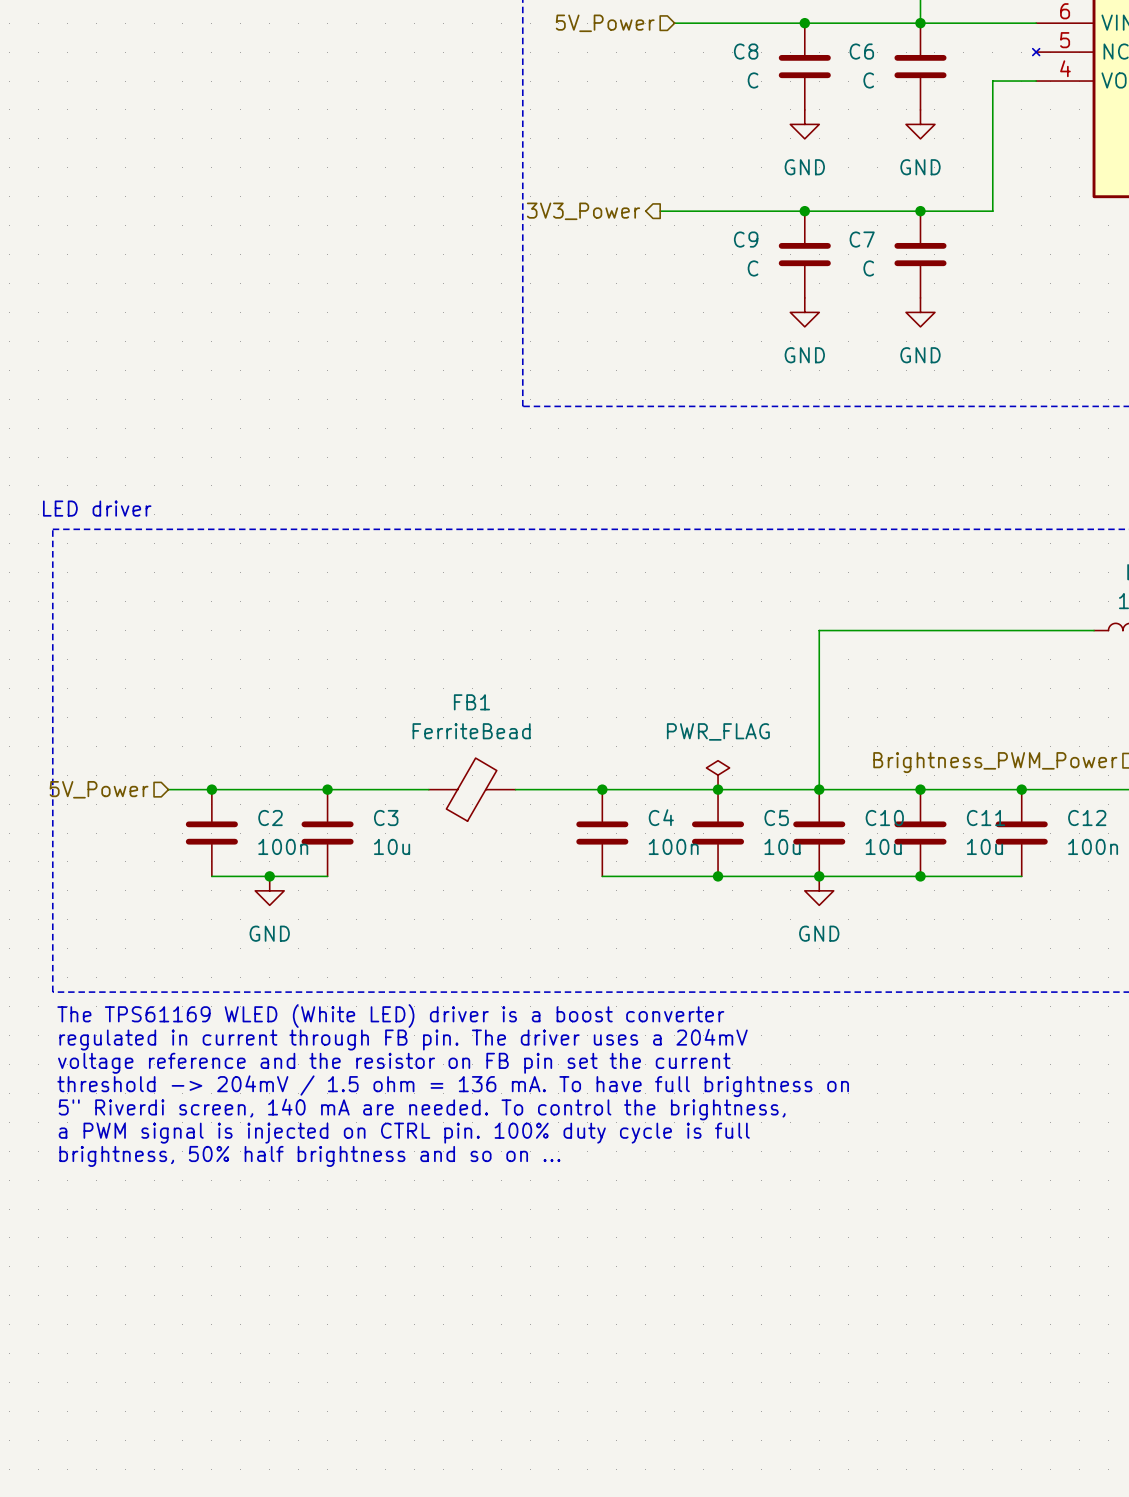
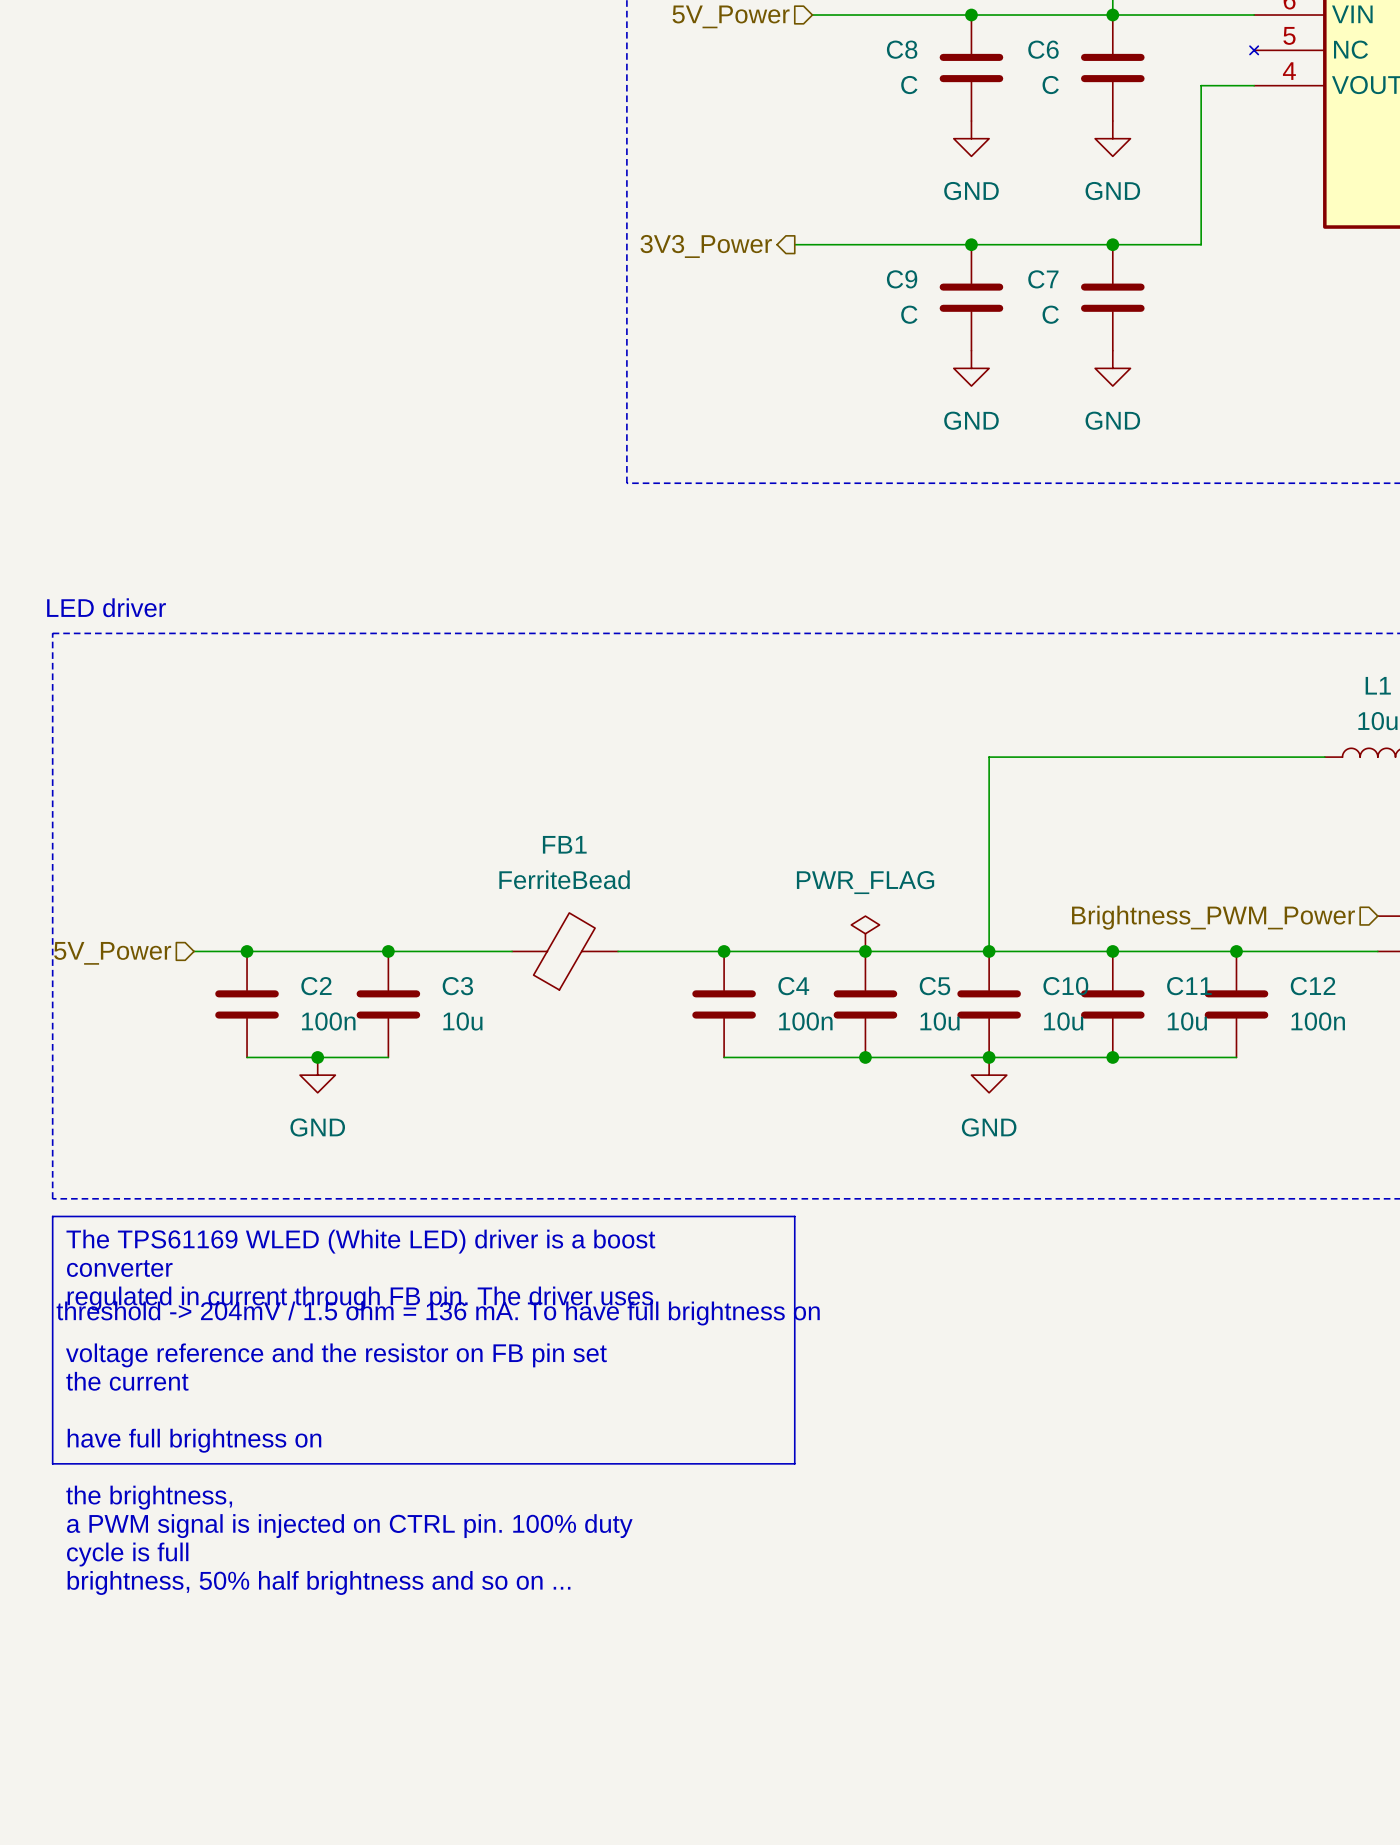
line: none -> (52, 1216) (794, 1216) (794, 1463) (52, 1463) (52, 1216)
text: The TPS61169 WLED (White LED) driver is a boost converter (390, 1016) -> The TPS61169 WLED (White LED) driver is a boost (360, 1241)
text: regulated in current through FB pin. The driver uses a 204mV (403, 1039) -> converter (119, 1268)
text: voltage reference and the resistor on FB pin set the current (394, 1063) -> regulated in current through FB pin. The driver uses (360, 1298)
text: 5" Riverdi screen, 140 mA are needed. To control the brightness, (422, 1109) -> voltage reference and the resistor on FB pin set (336, 1355)
text: a PWM signal is injected on CTRL pin. 100% duty cycle is full (404, 1133) -> the current (127, 1381)
text position: brightness, 50% half brightness and so on ... (309, 1156) -> brightness, 50% half brightness and so on ... (318, 1582)
text: none -> have full brightness on (194, 1440)
text: none -> the brightness, (149, 1497)
text: none -> a PWM signal is injected on CTRL pin. 100% duty (349, 1526)
text: none -> cycle is full (127, 1554)

